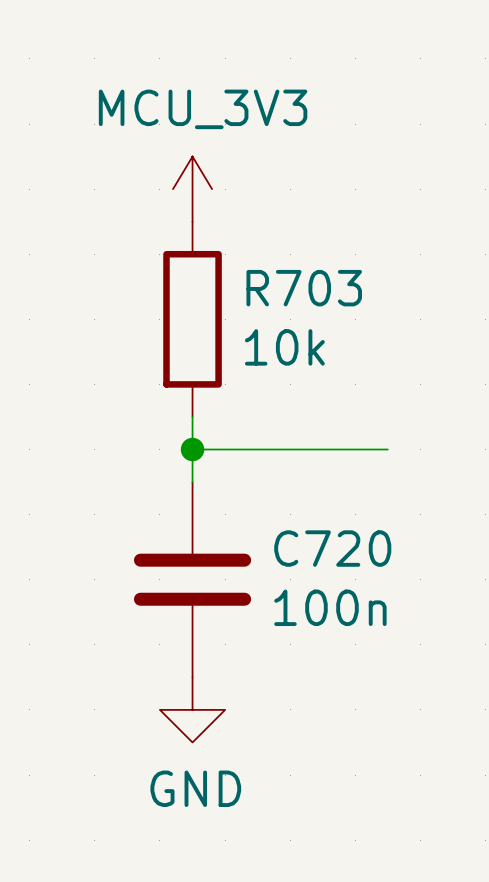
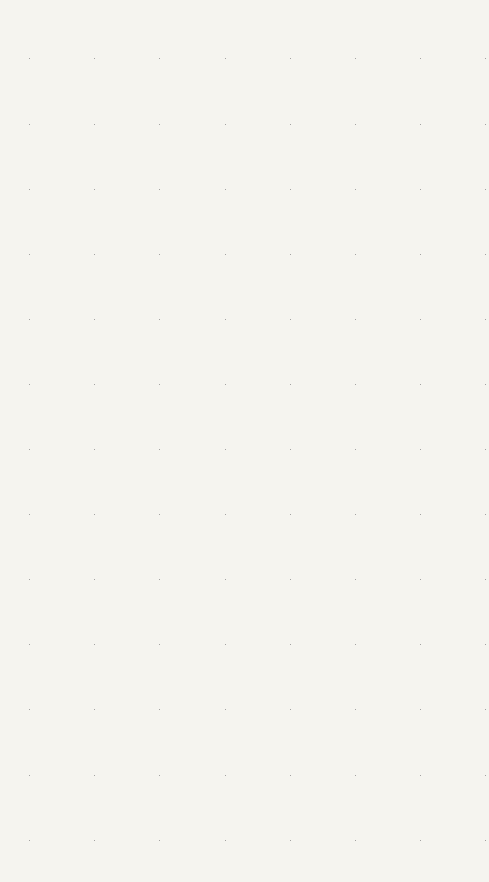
power symbol: MCU_3V3 (192, 189) -> none
R703: 10k (192, 319) -> none
wire: (192, 416) (192, 482) -> none
wire: (192, 449) (387, 449) -> none
junction: (192, 449) -> none
C720: 100n (192, 579) -> none
power symbol: GND (192, 709) -> none

